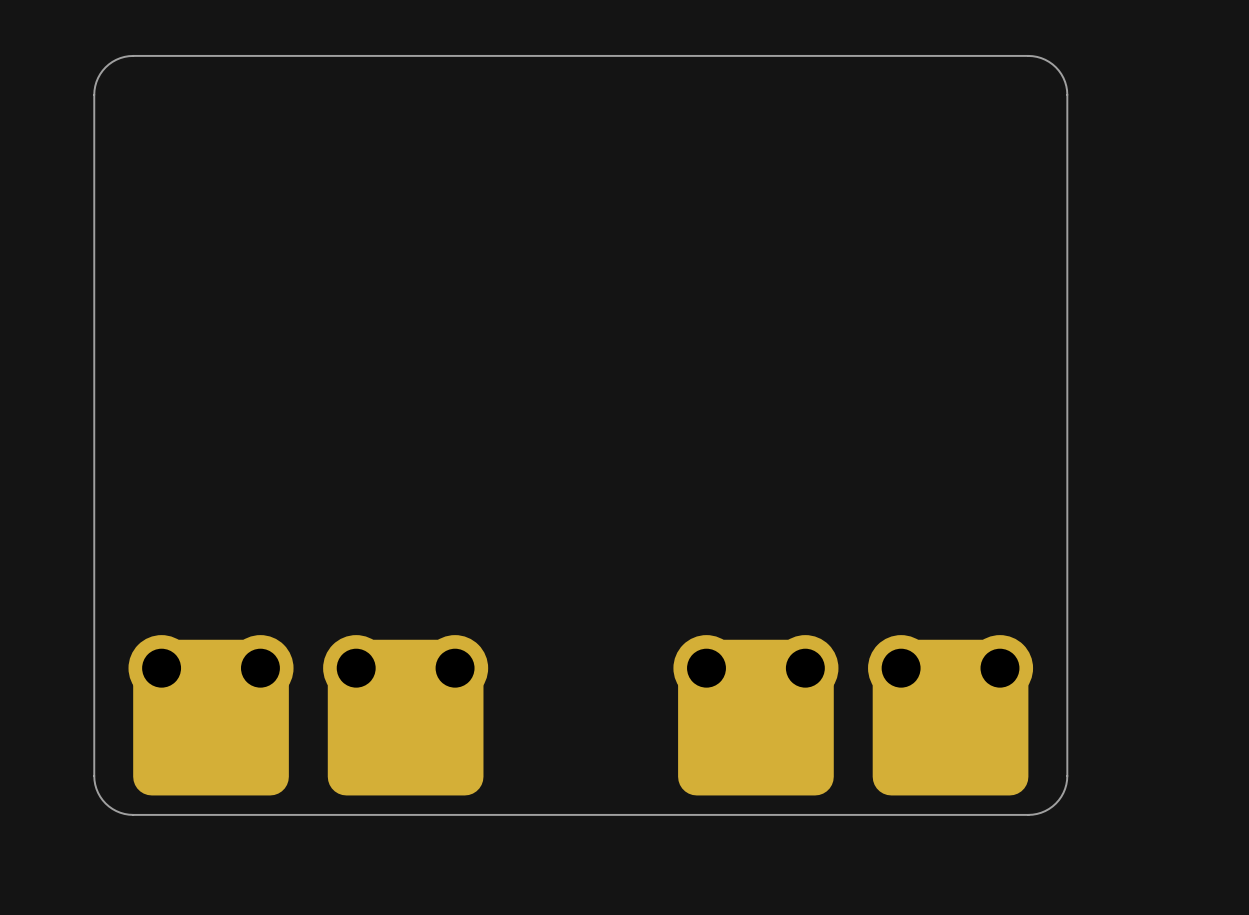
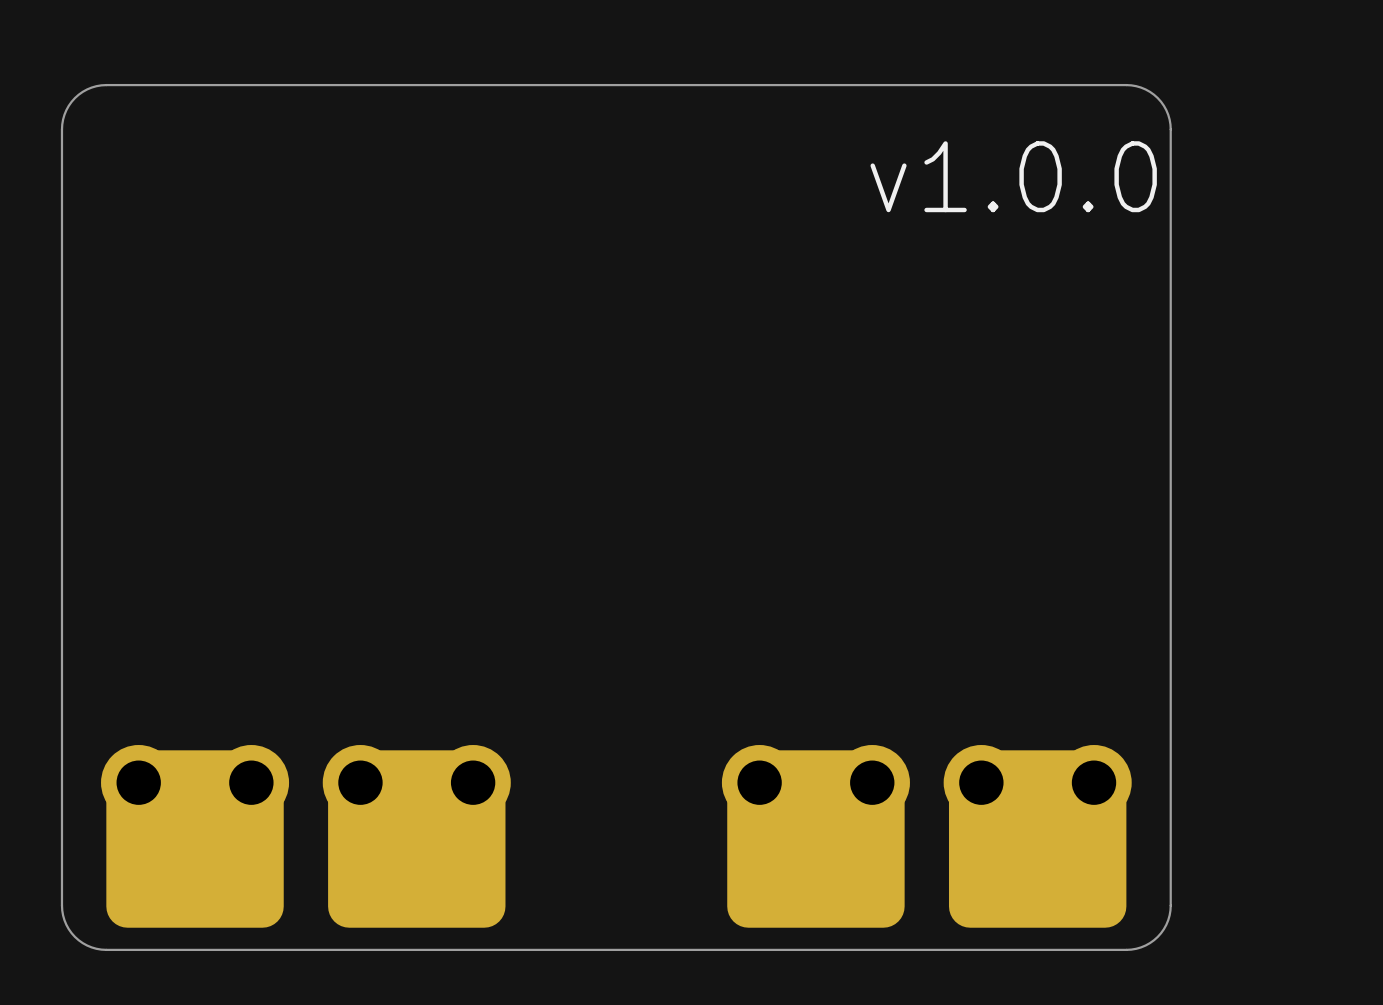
text: none -> v1.0.0 (1013, 176)

